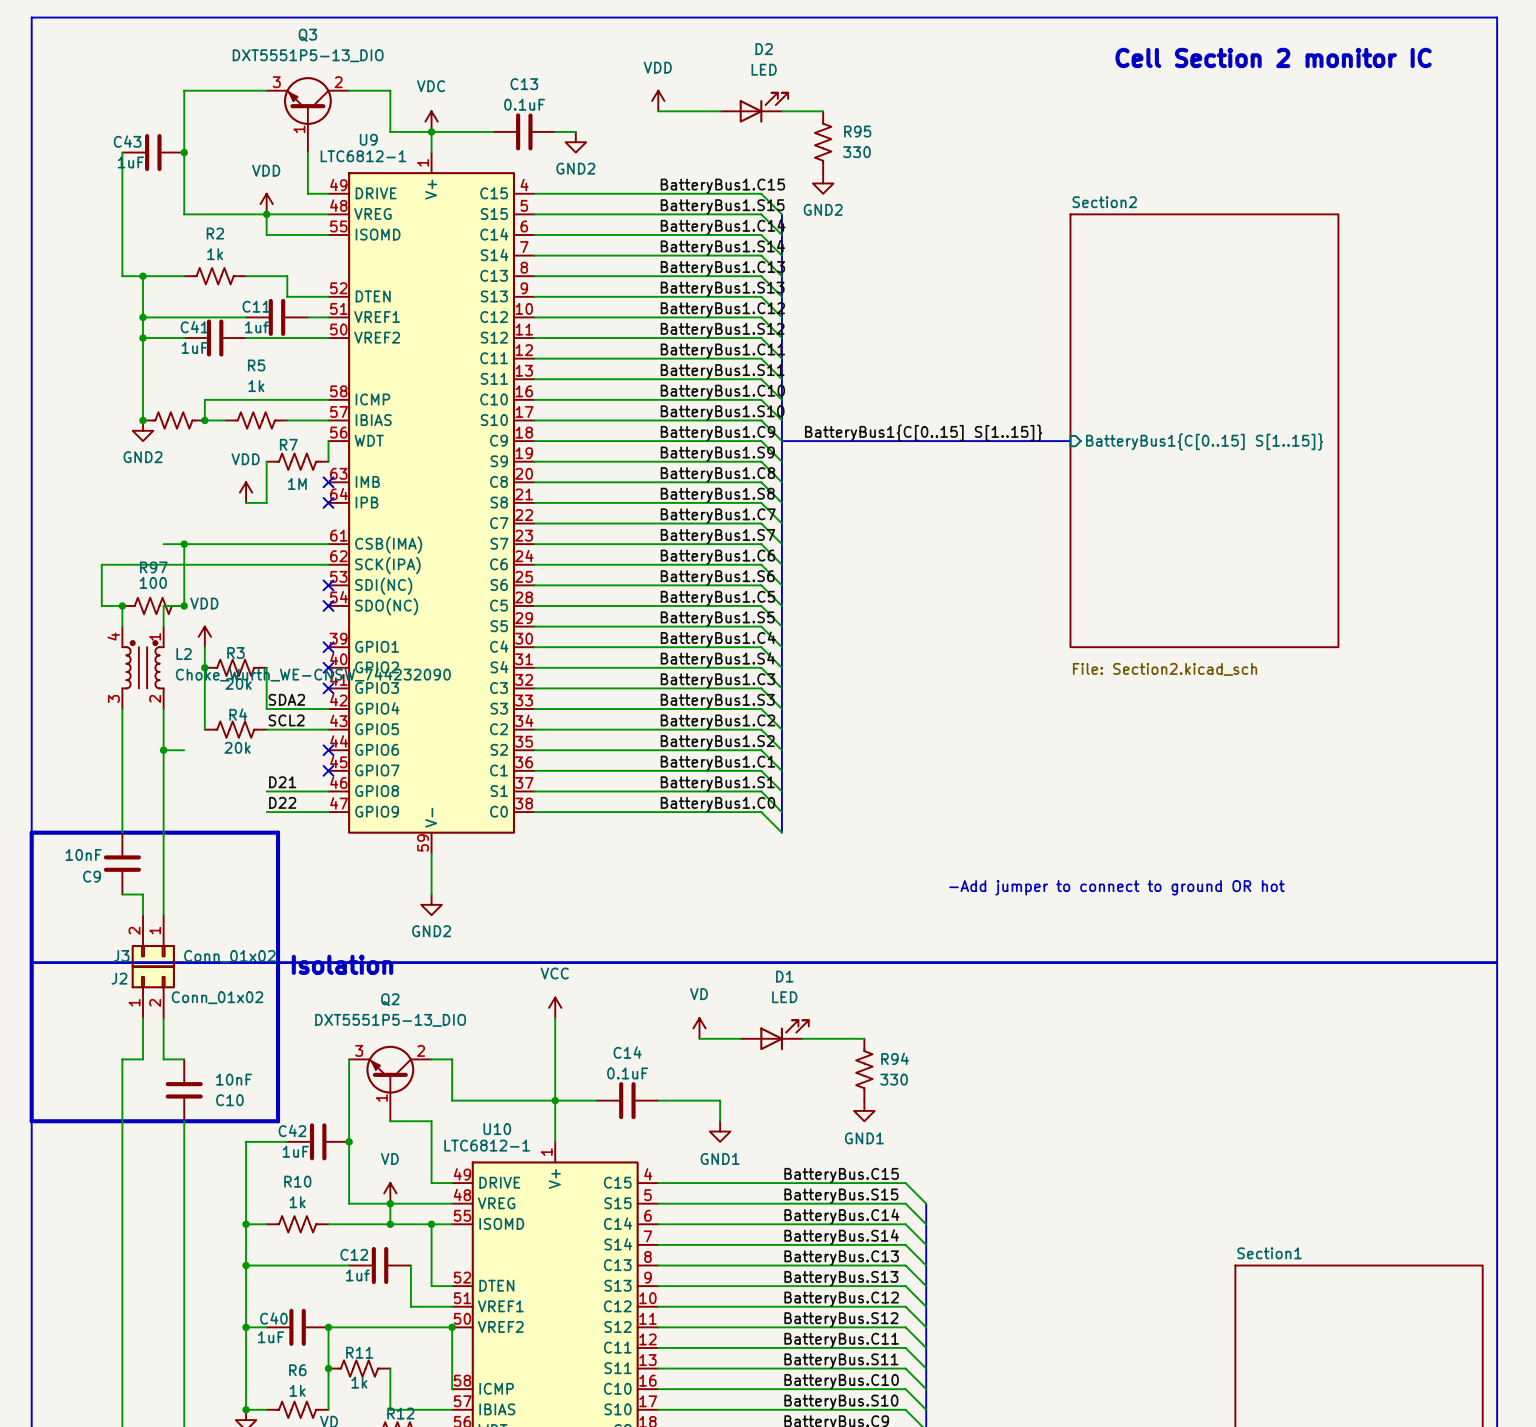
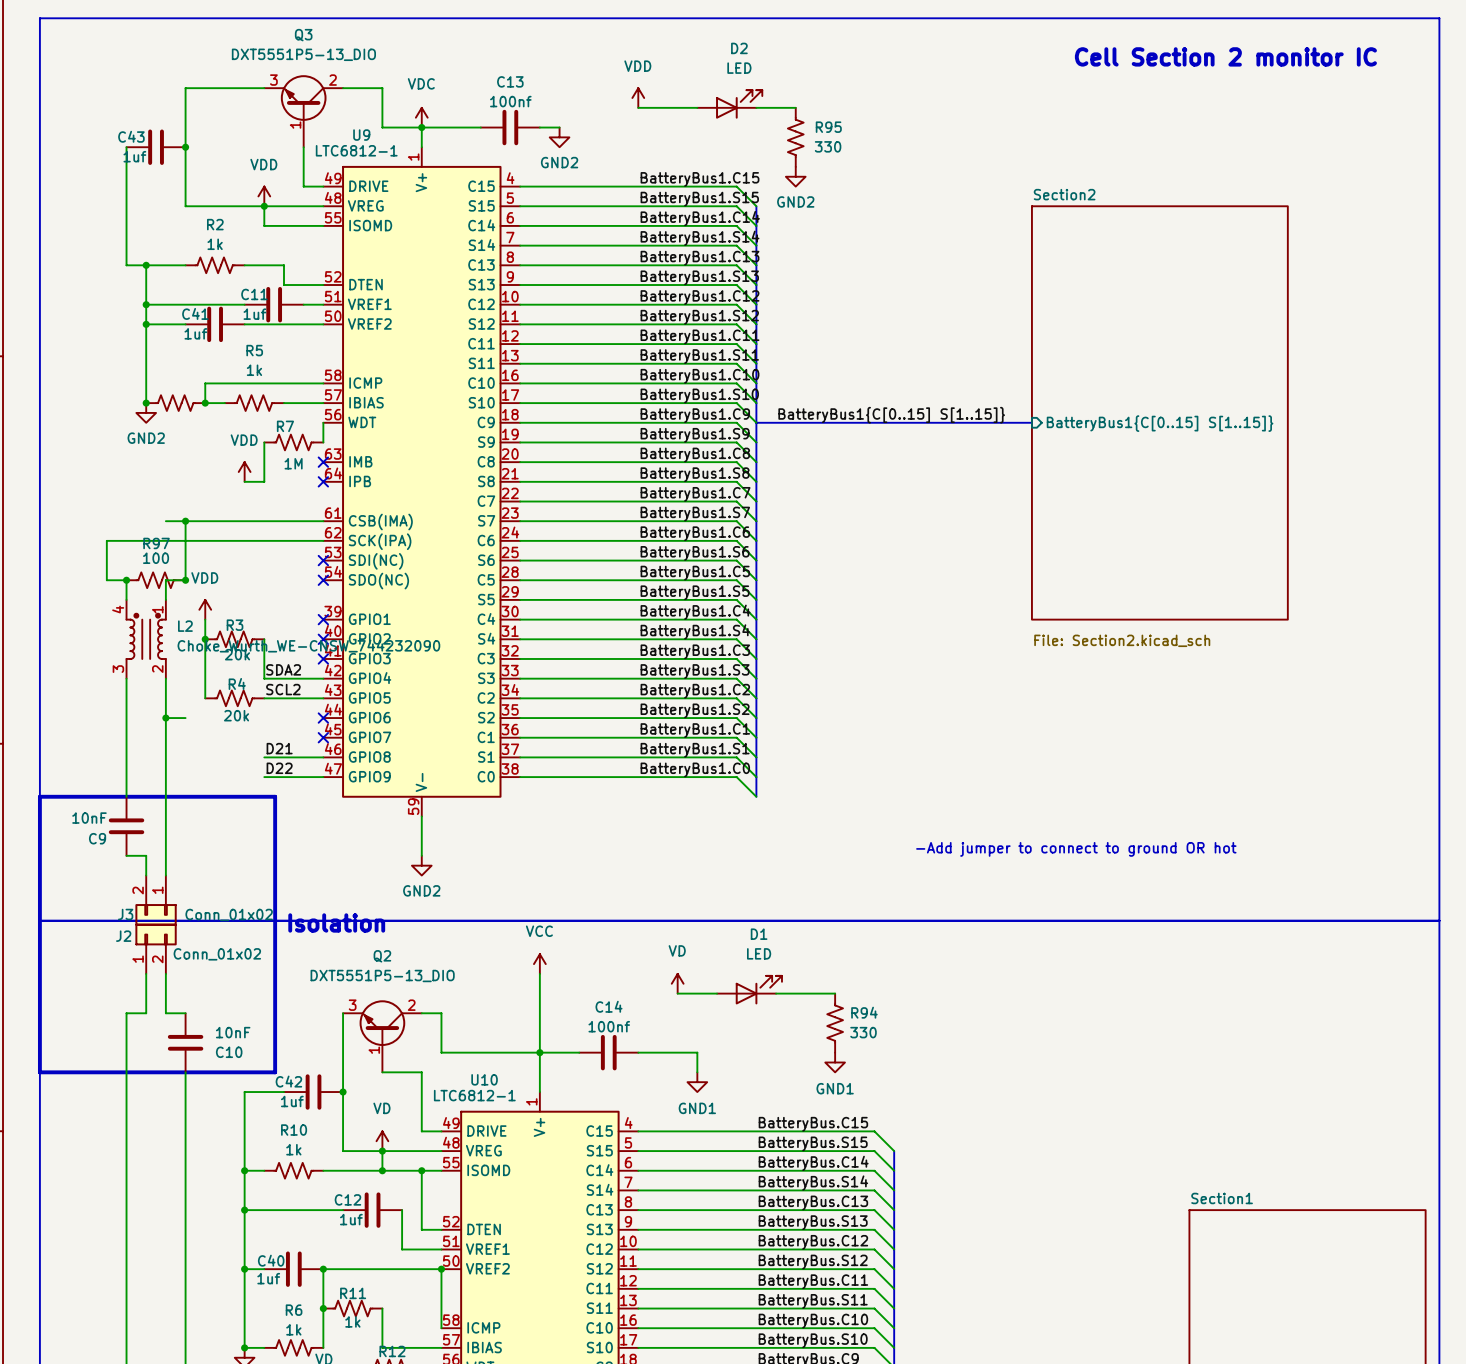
C13 value: 0.1uF (524, 104) -> 100nf (510, 101)
C43 value: 1uF (130, 162) -> 1uf (134, 156)
C41 value: 1uF (194, 347) -> 1uf (195, 333)
C14 value: 0.1uF (627, 1073) -> 100nf (609, 1026)
C42 value: 1uF (295, 1151) -> 1uf (292, 1101)
C40 value: 1uF (271, 1337) -> 1uf (268, 1278)

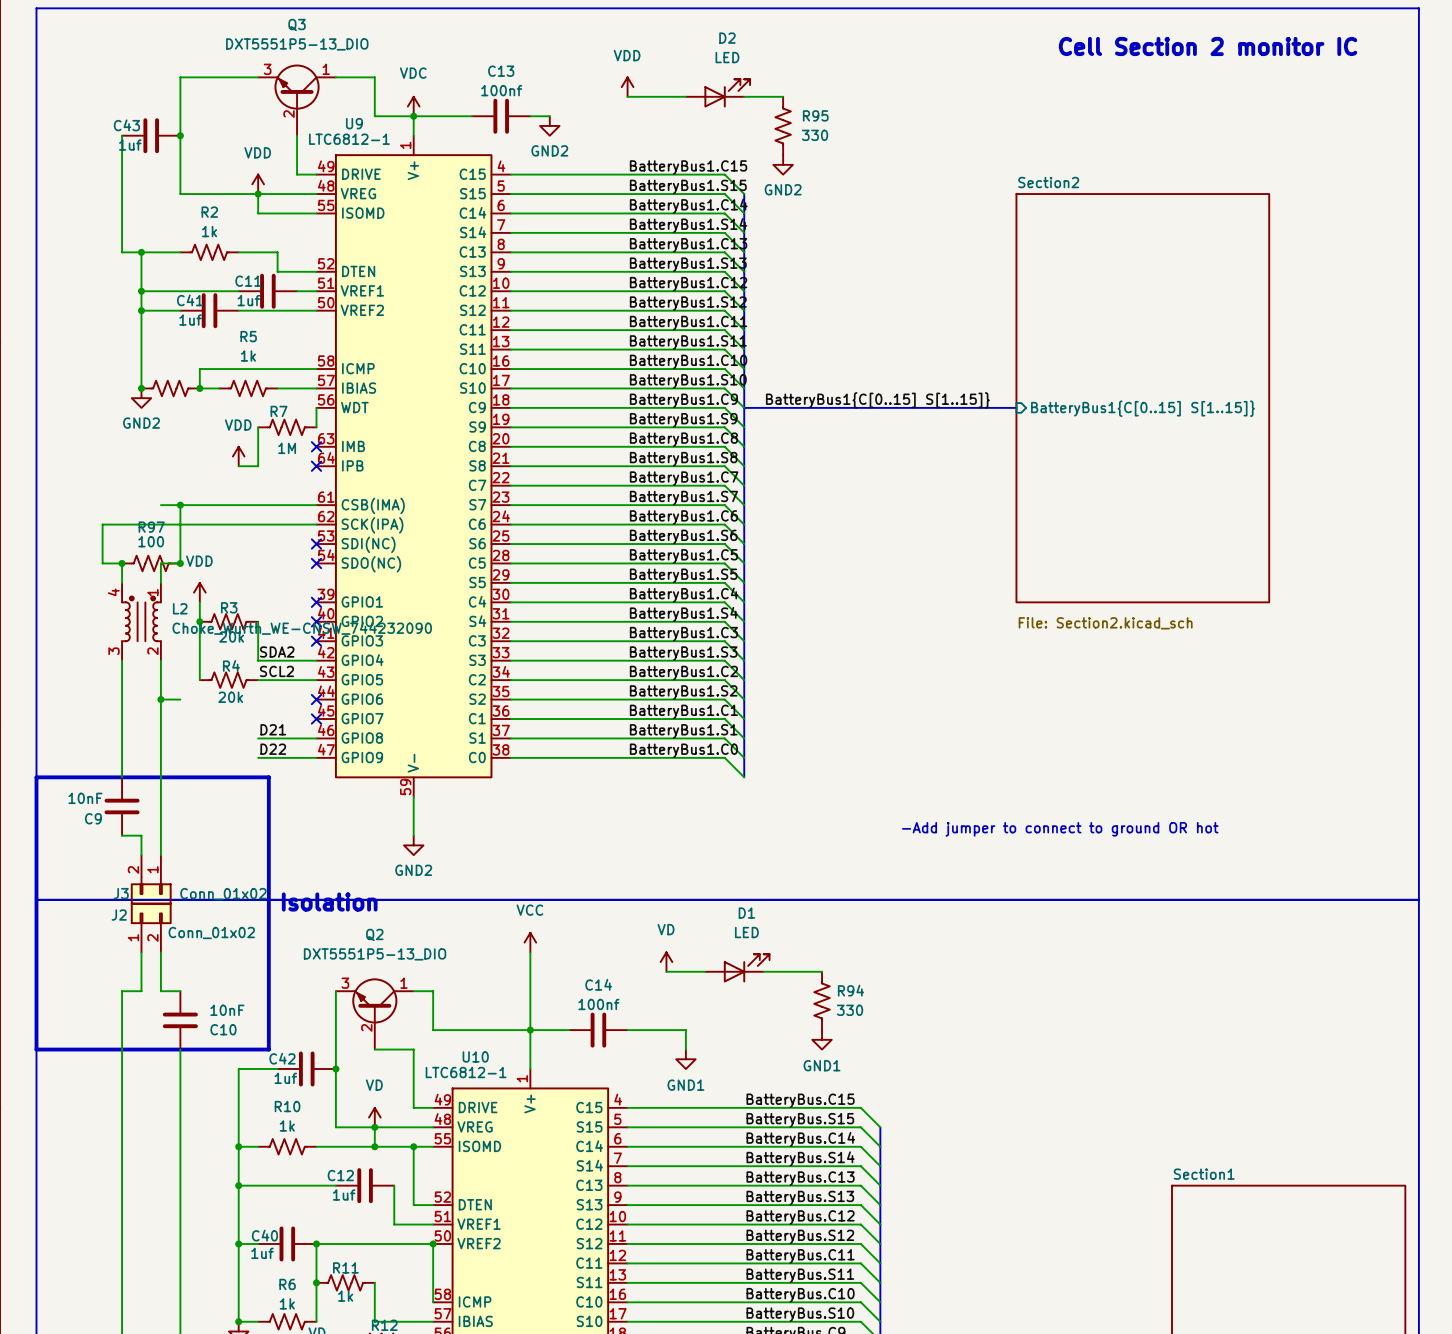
Q3 pin number: 2 (332, 80) -> 1 (326, 69)
Q3 pin number: 1 (295, 125) -> 2 (289, 114)
Q2 pin number: 2 (411, 1005) -> 1 (403, 983)
Q2 pin number: 1 (374, 1050) -> 2 (366, 1027)

